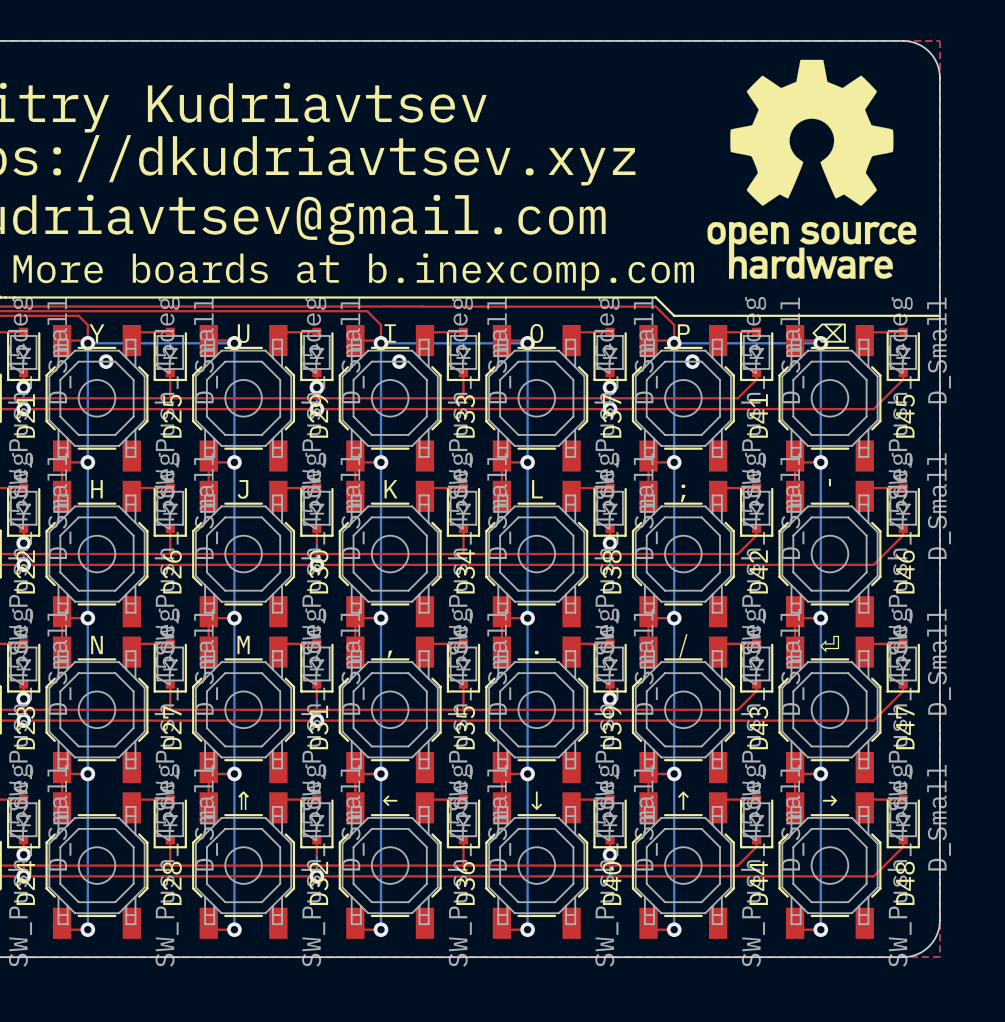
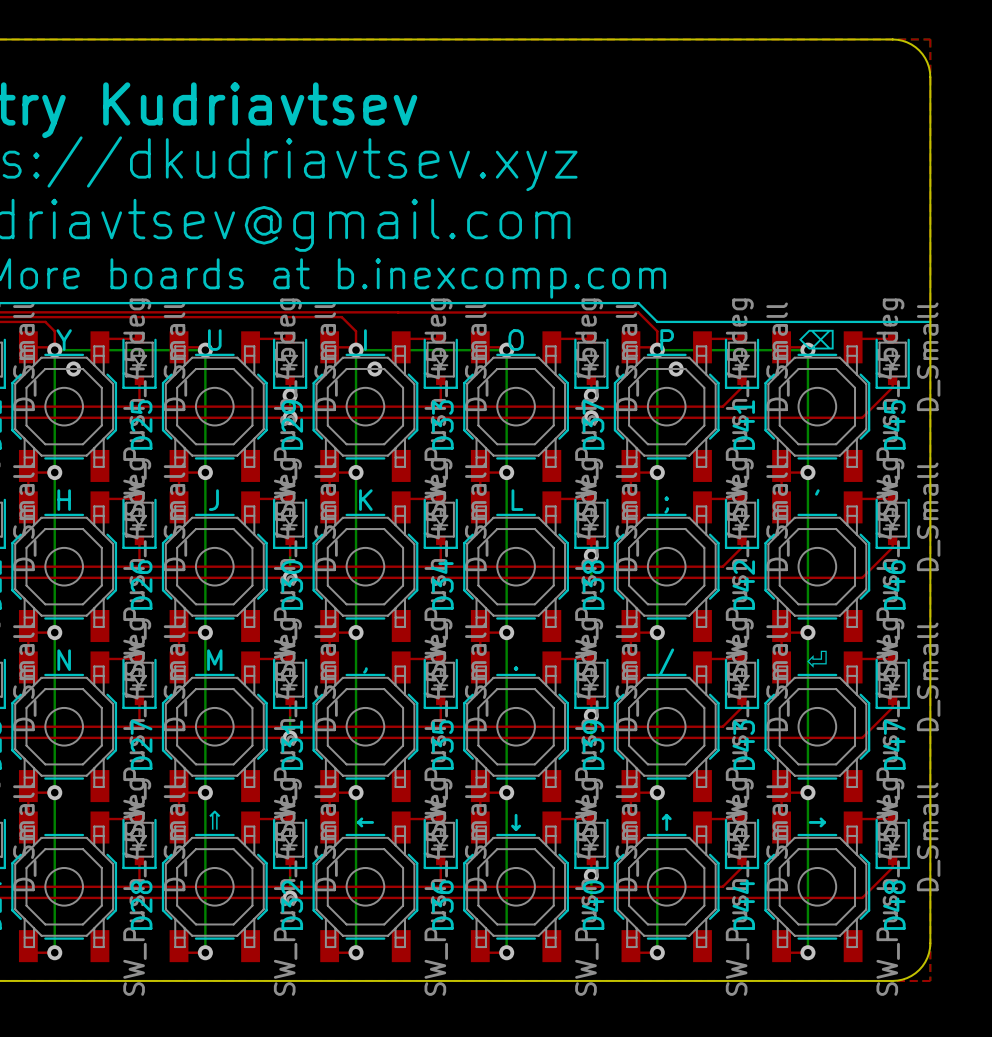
drawing: [707, 59, 917, 279] -> none

